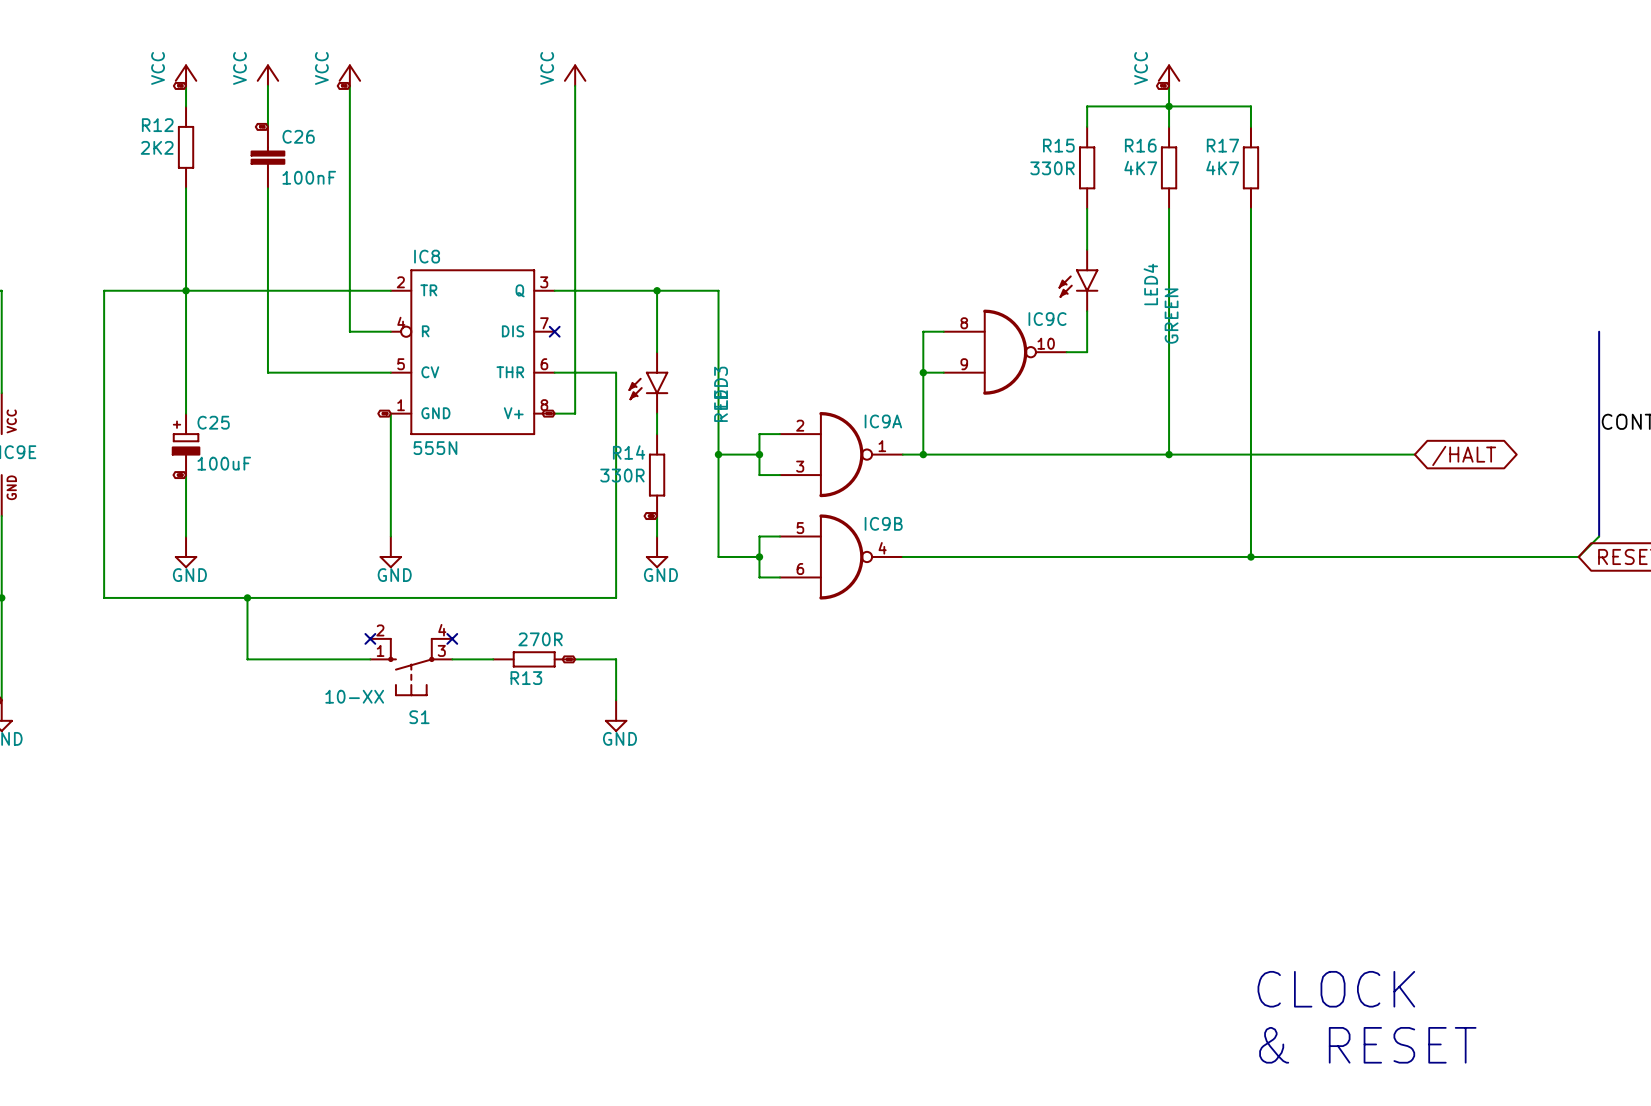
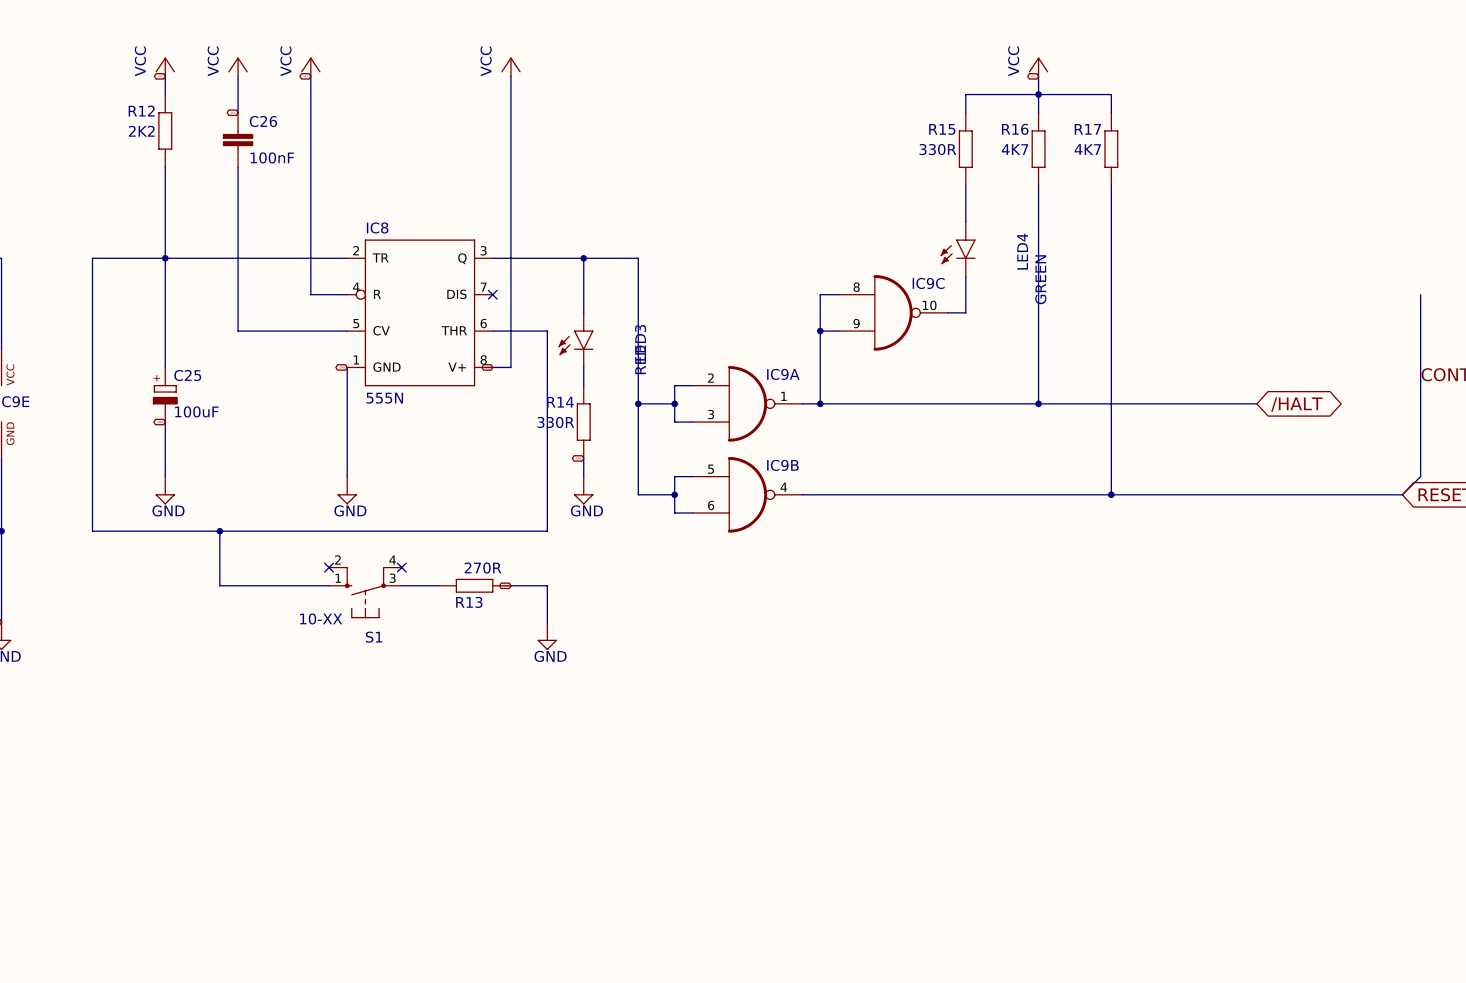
text: CLOCK (1336, 989) -> none
text: & RESET (1367, 1045) -> none

